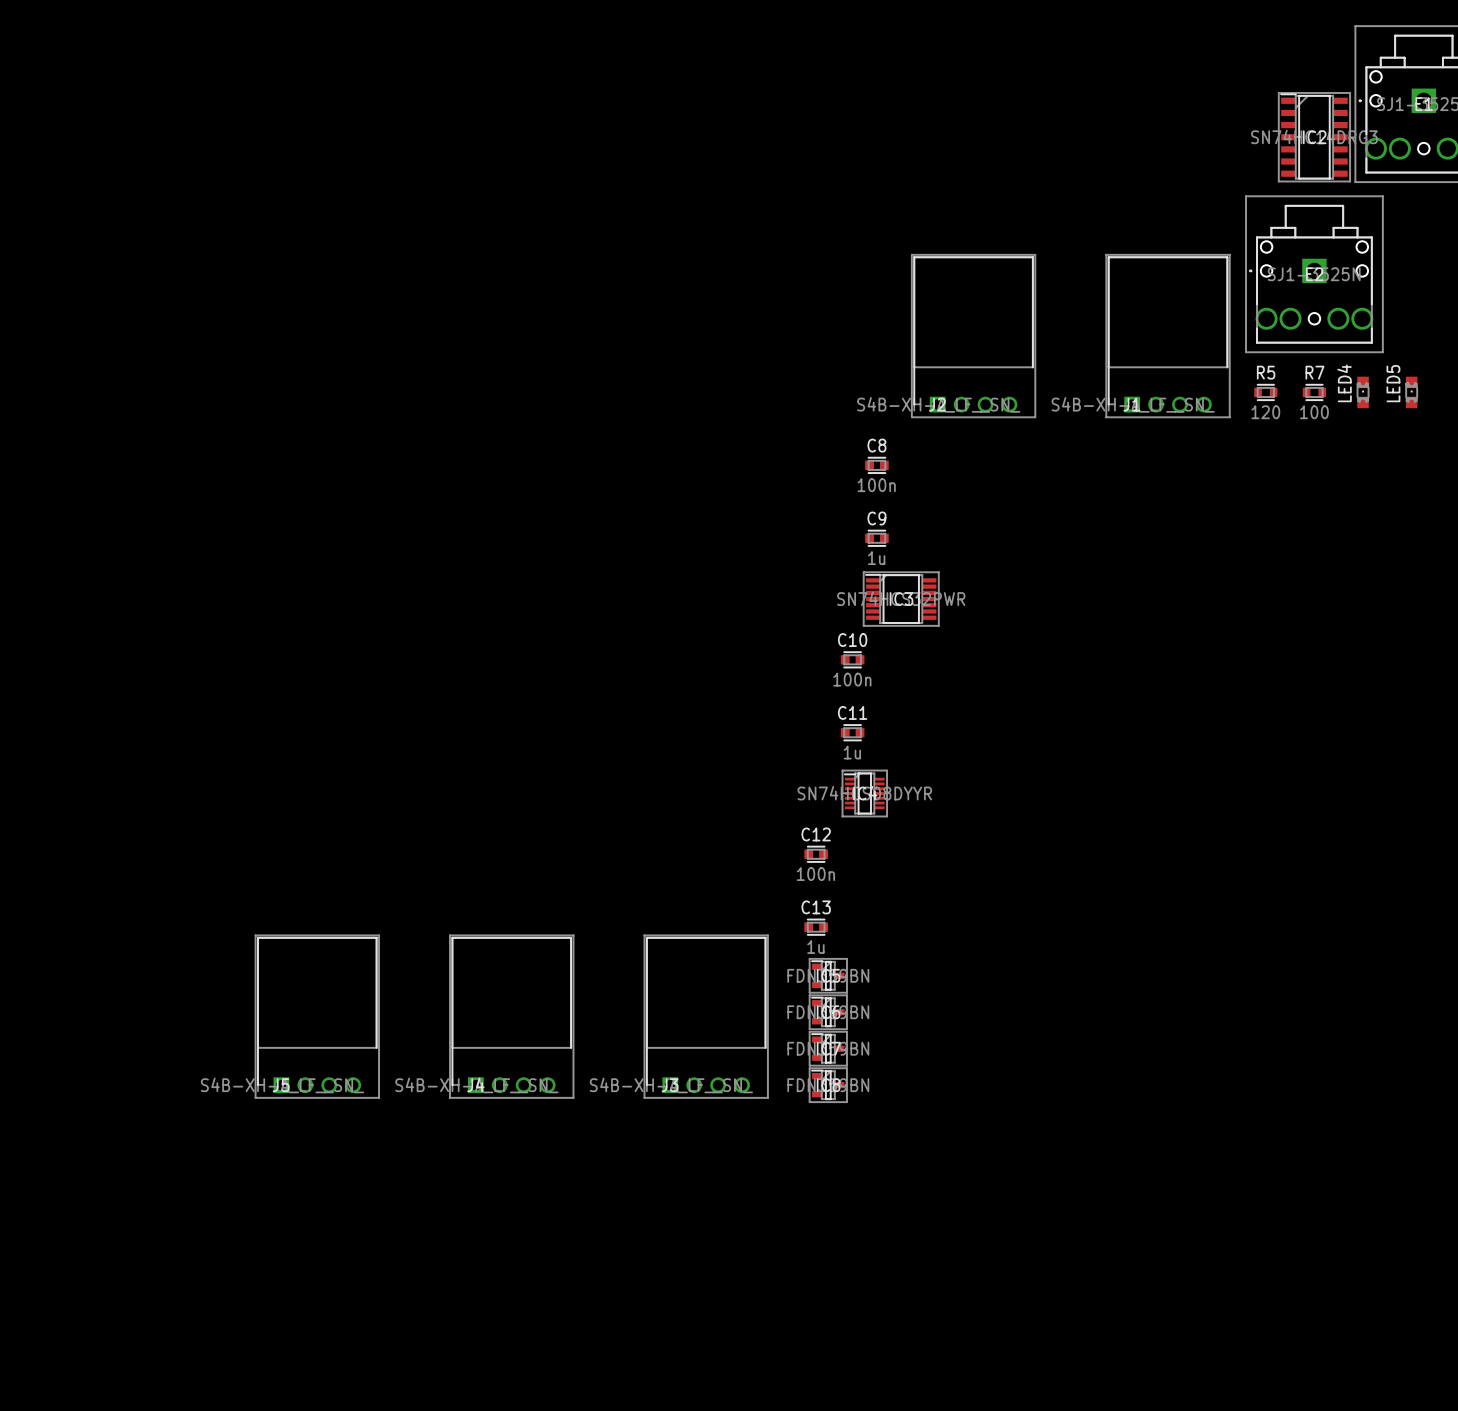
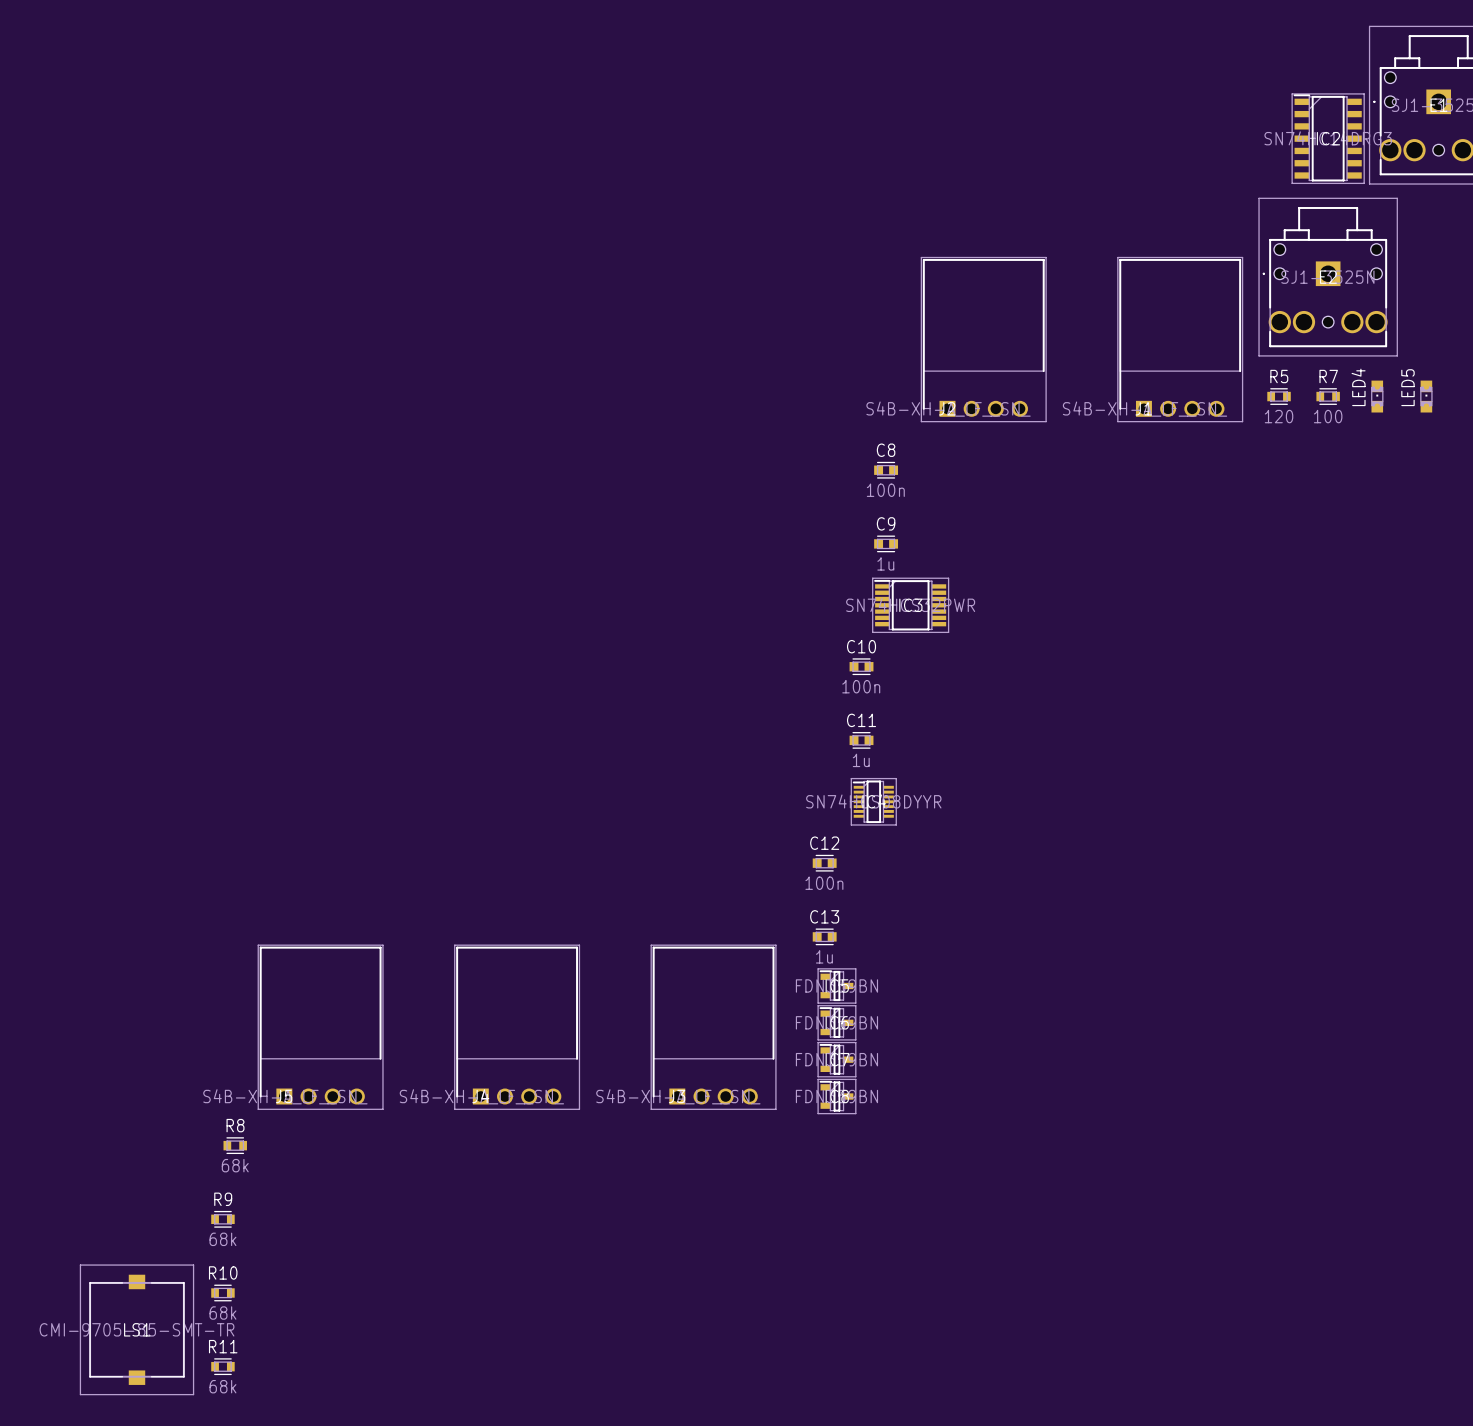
R8: none -> 68k (235, 1145)
R9: none -> 68k (222, 1219)
R10: none -> 68k (222, 1292)
LS1: none -> CMI-9705-85-SMT-TR (136, 1329)
R11: none -> 68k (222, 1366)

